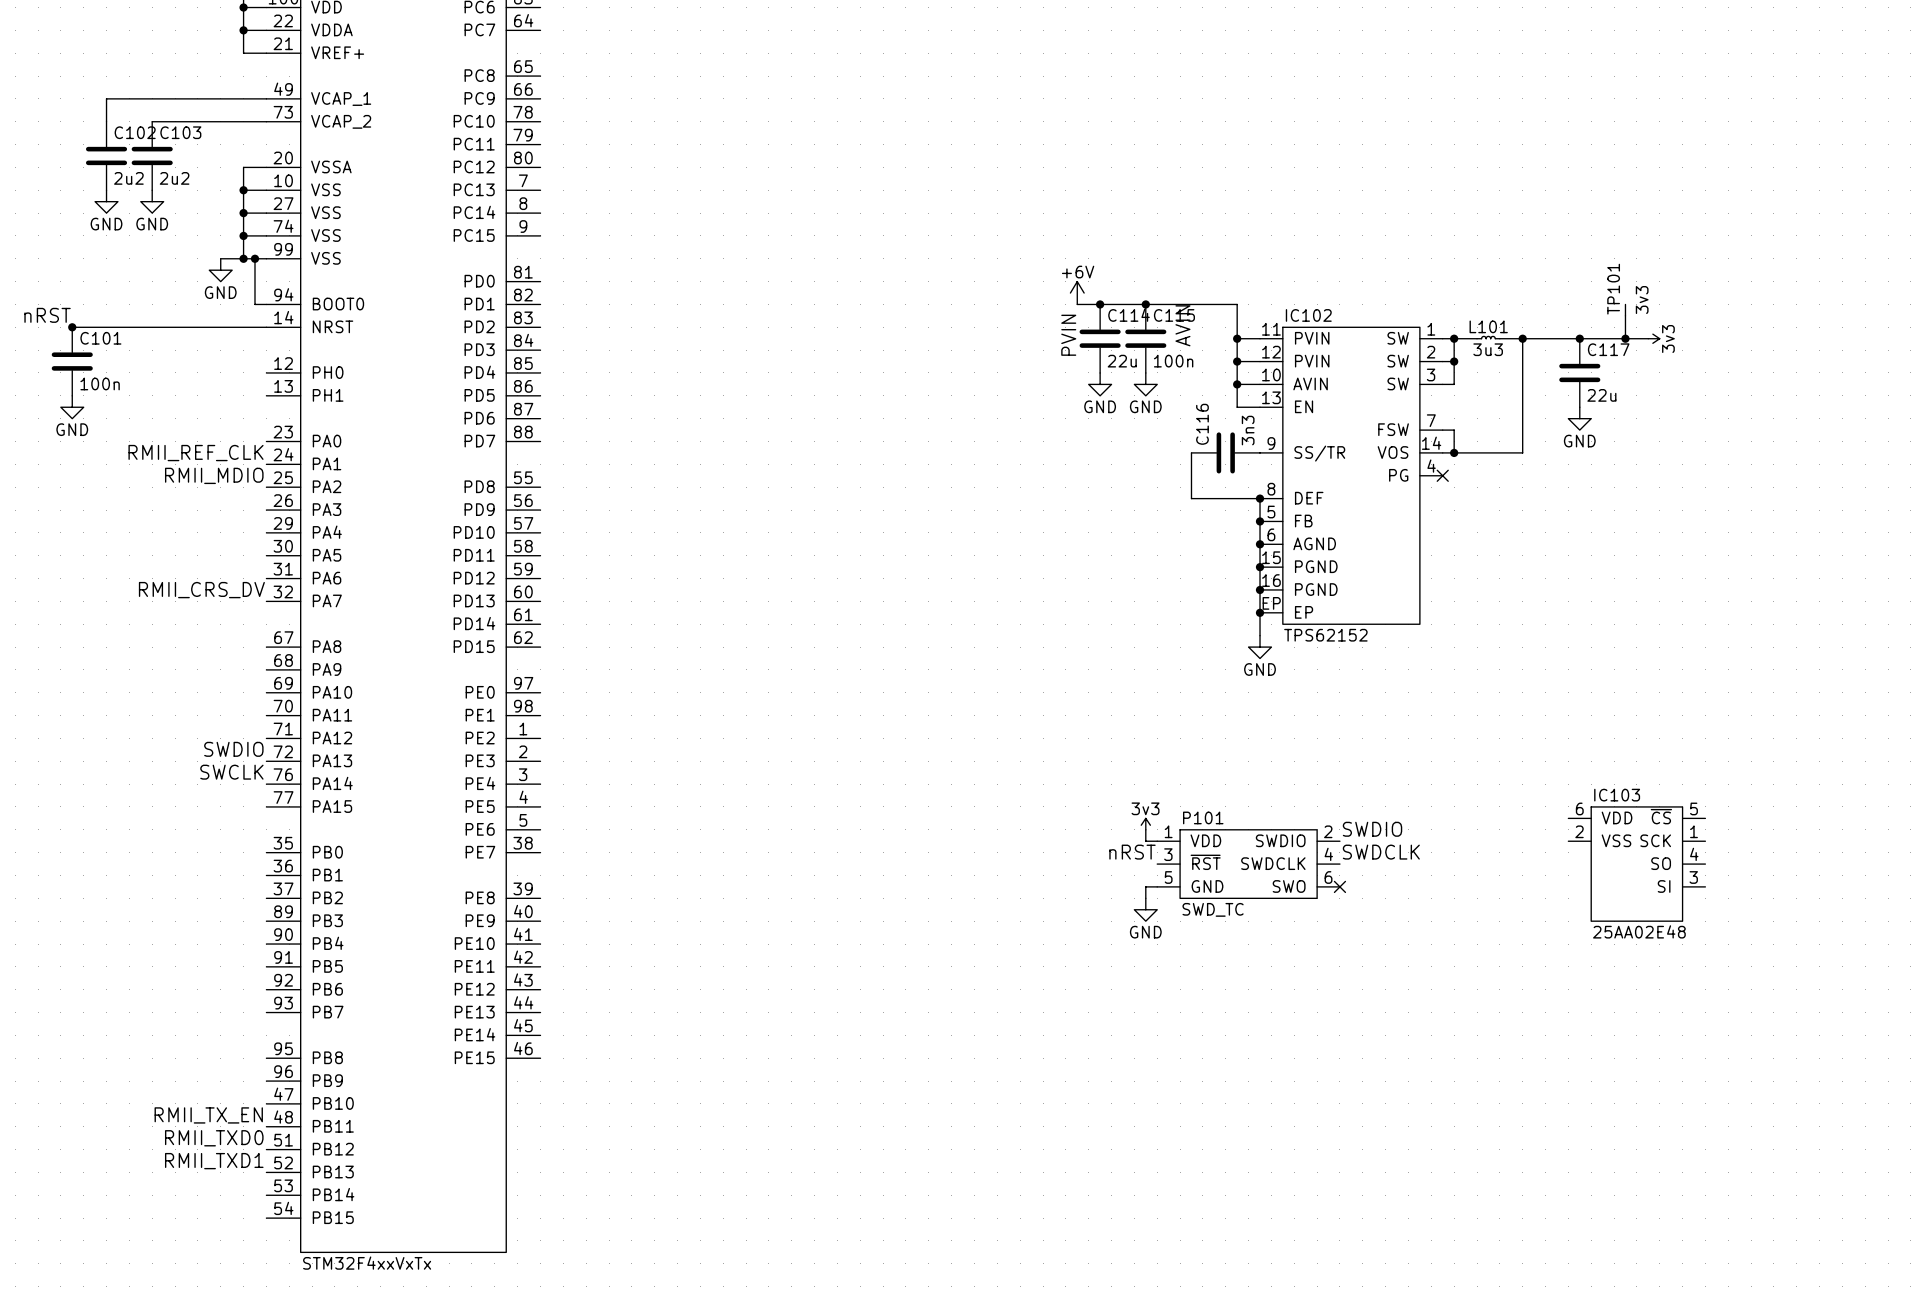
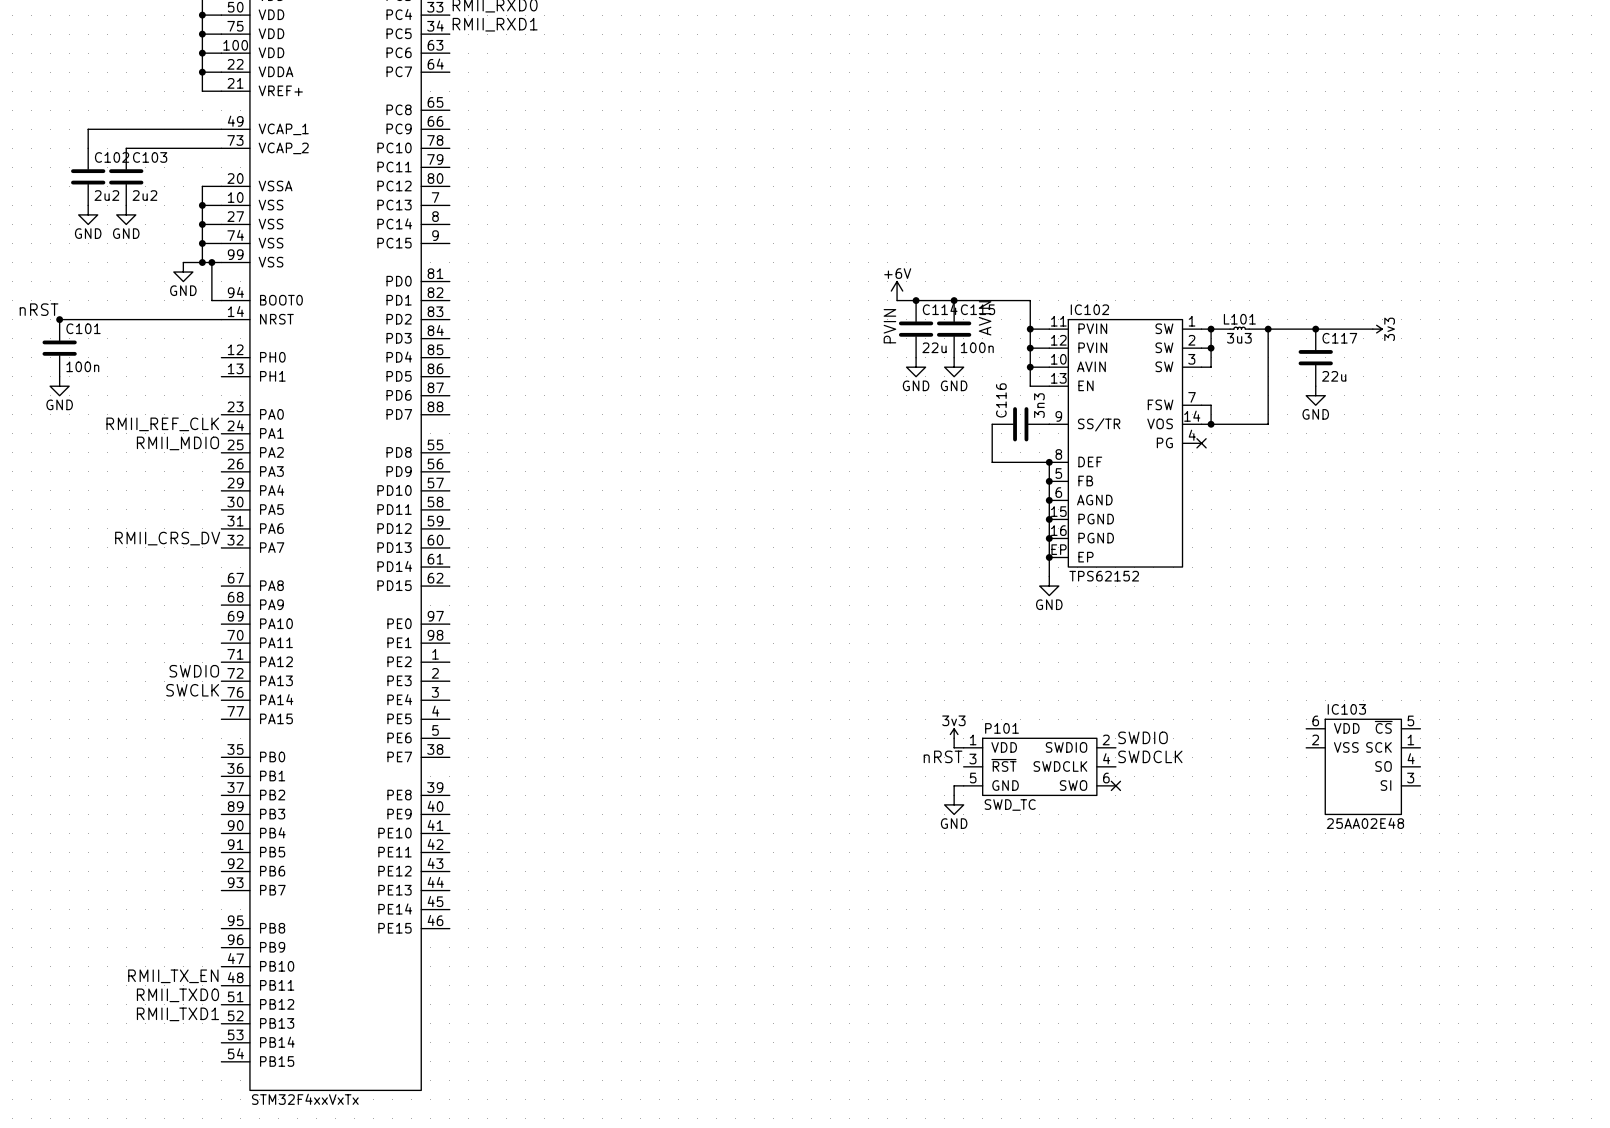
TP101: 3v3 (1625, 307) -> none
wire: (1625, 315) (1625, 338) -> none
junction: (1625, 338) -> none

